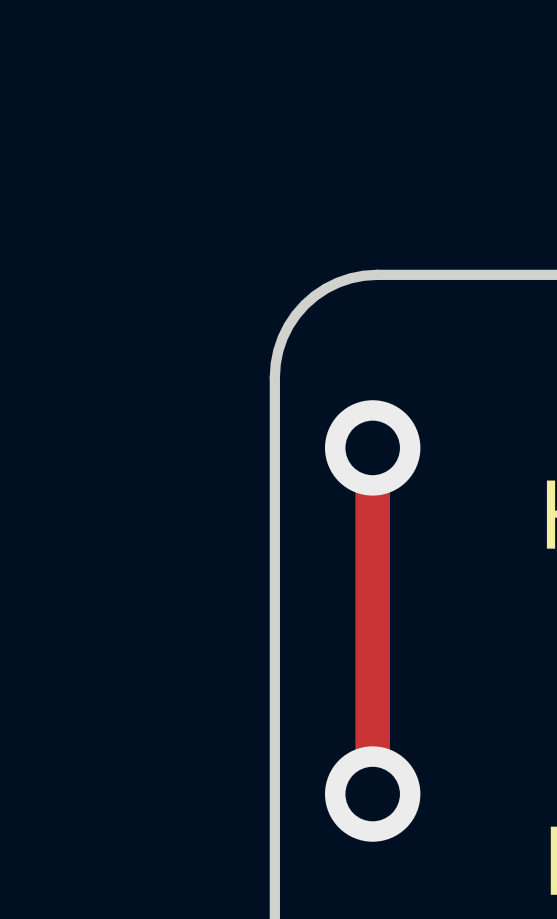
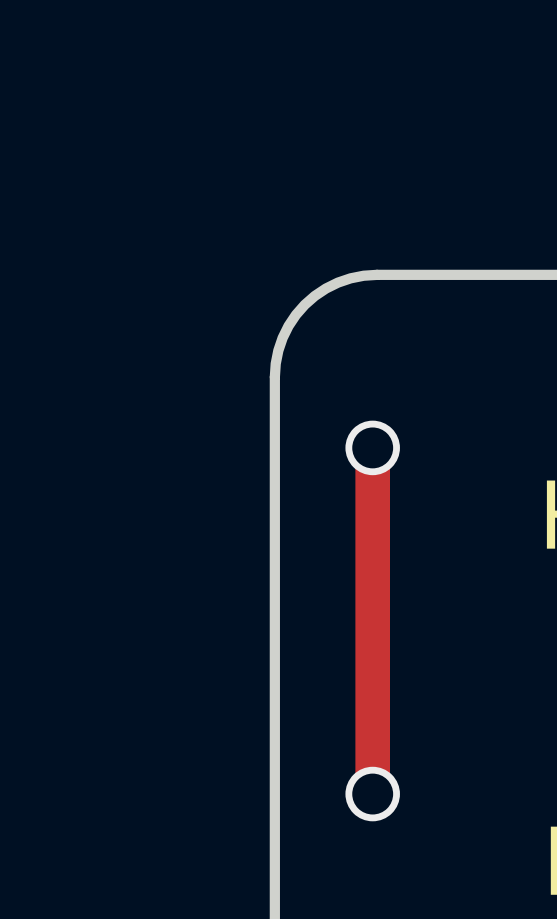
via size: [325, 400, 421, 496] -> [345, 420, 400, 476]
via size: [325, 746, 421, 842] -> [345, 766, 400, 822]

